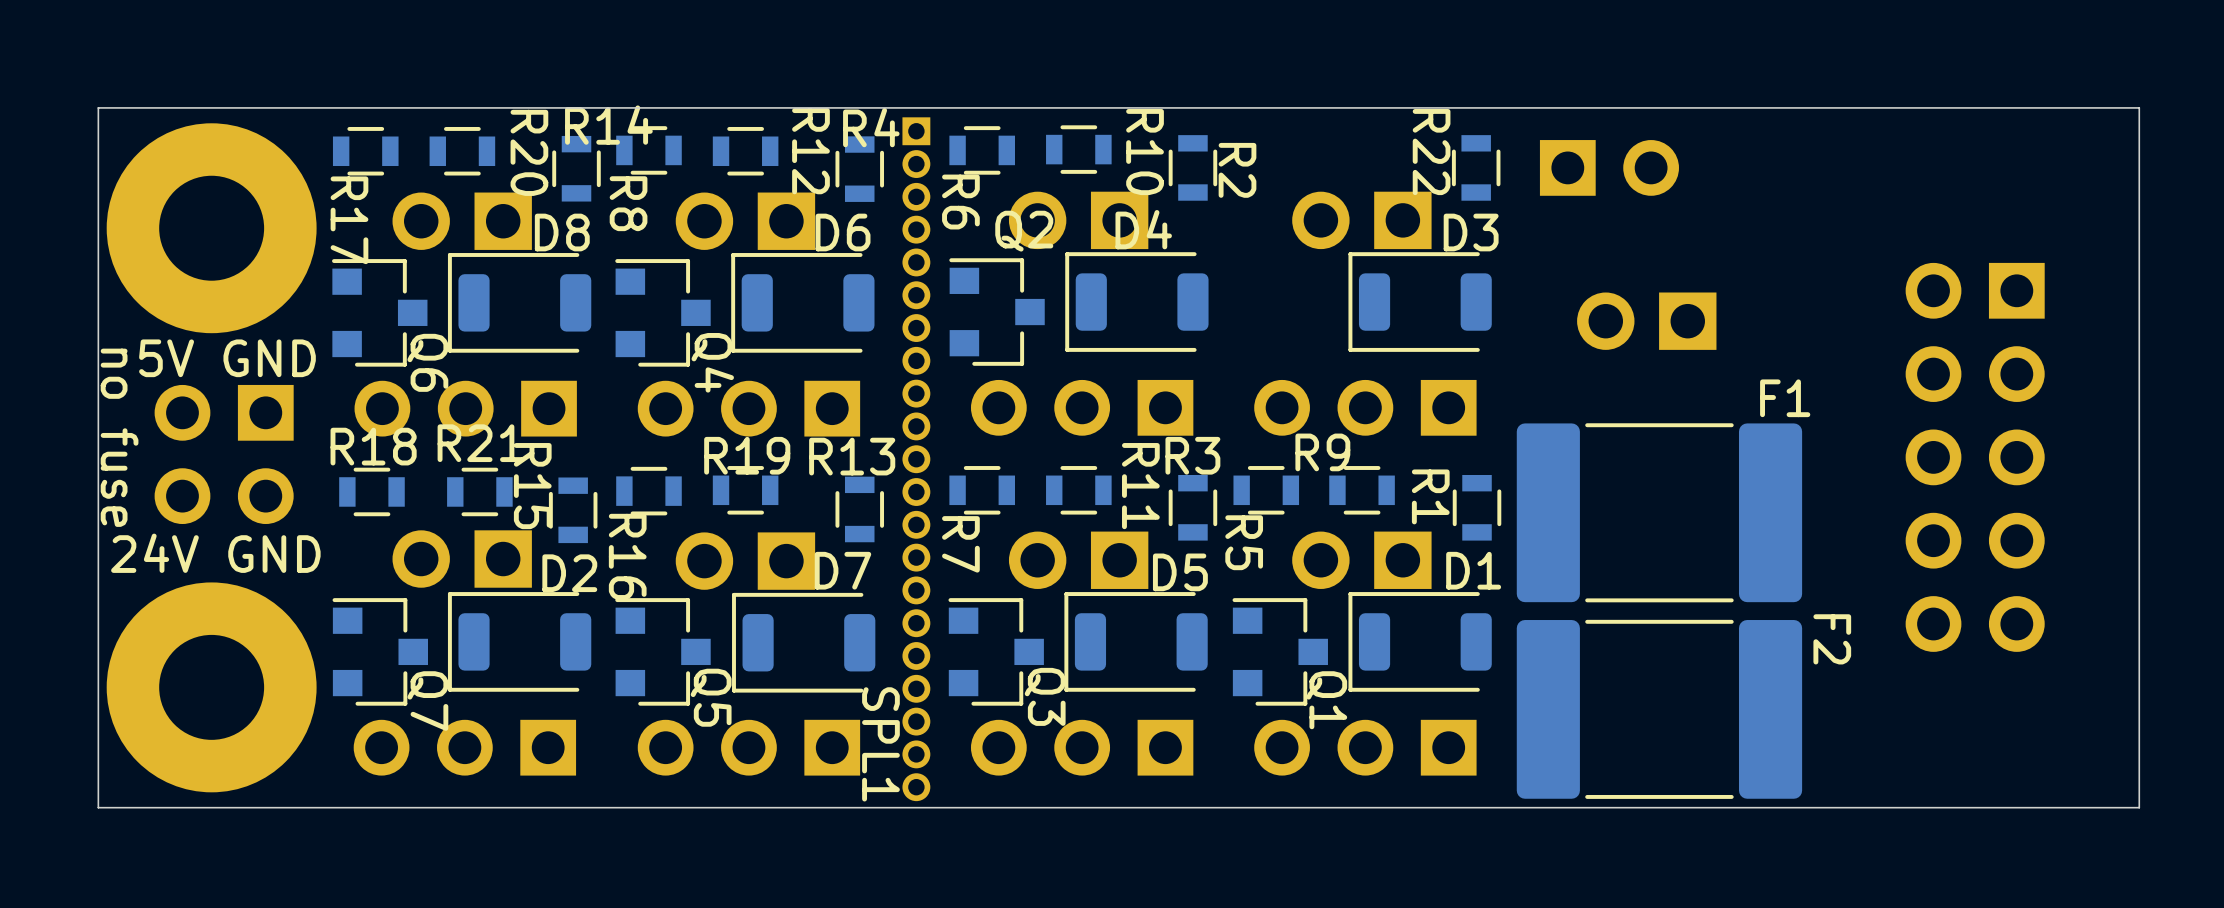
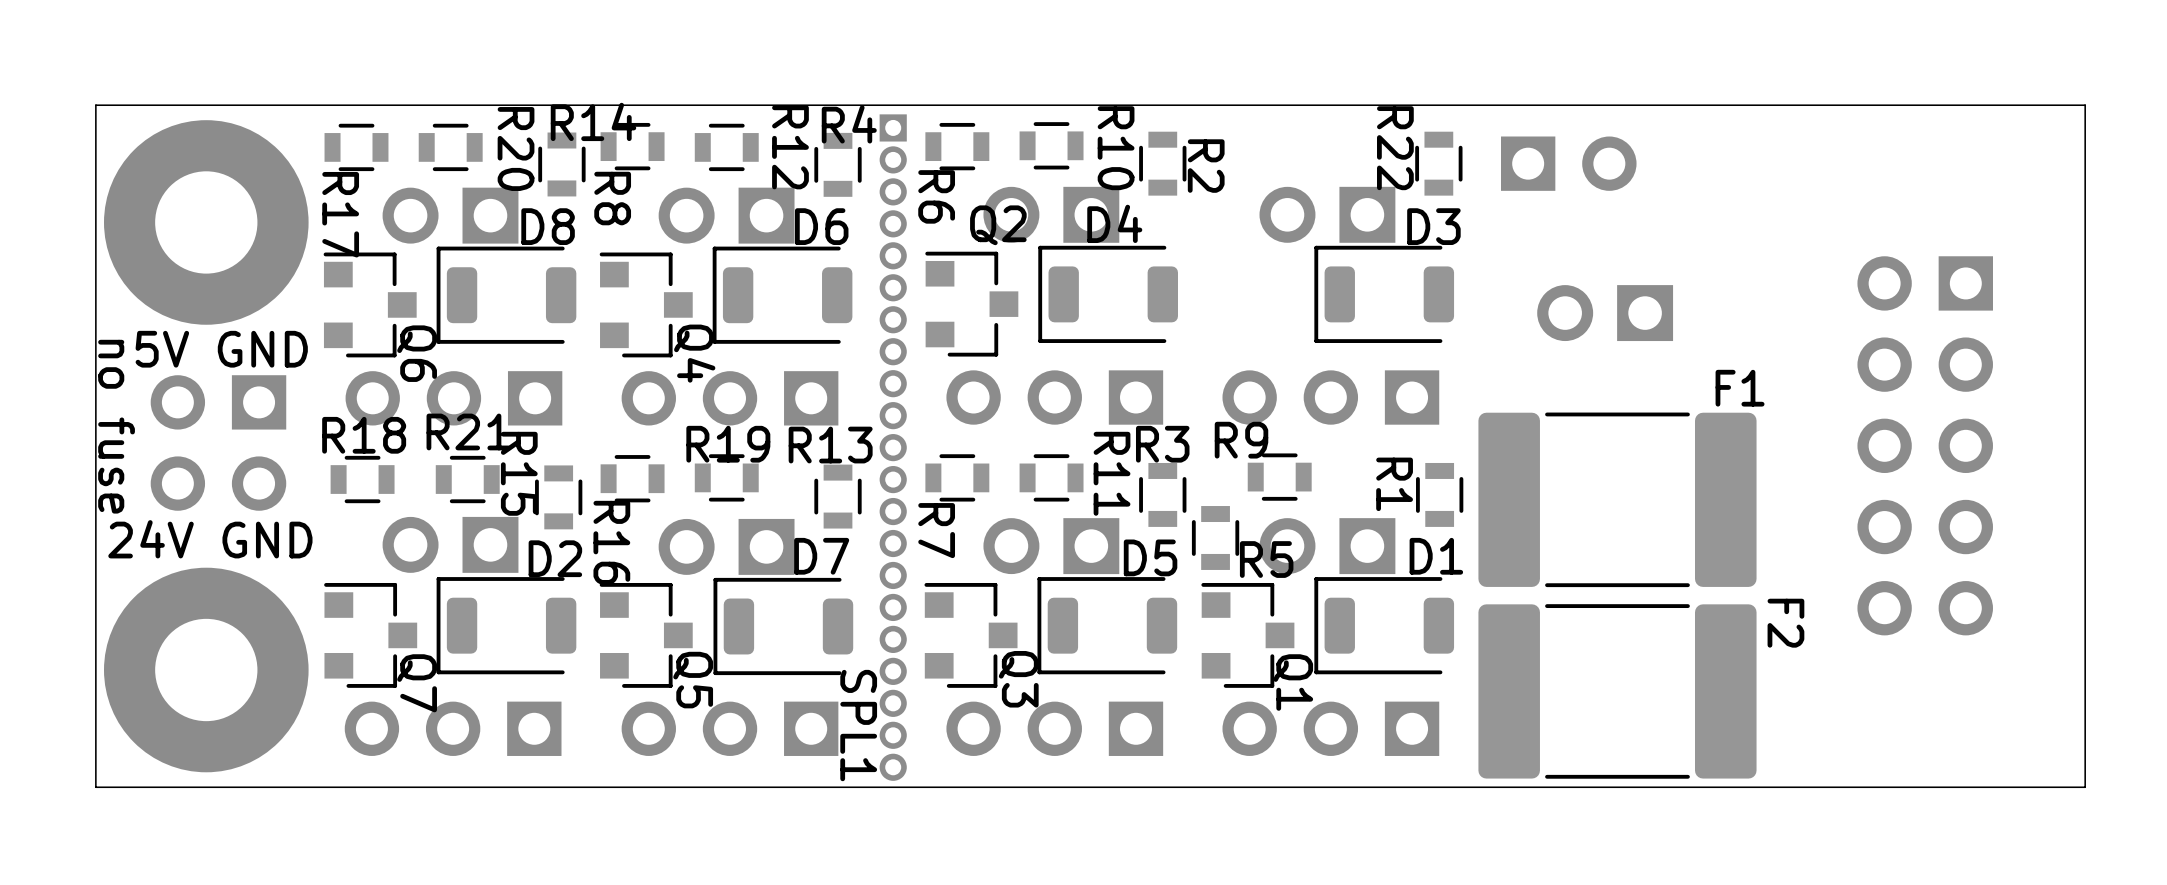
R5 rotation: 0° (1266, 490) -> 90° clockwise (1215, 537)
R5 position: (1266, 490) -> (1215, 537)
R9 position: (1362, 490) -> (1279, 477)
R5 name position: R5 (1244, 542) -> R5 (1266, 559)

